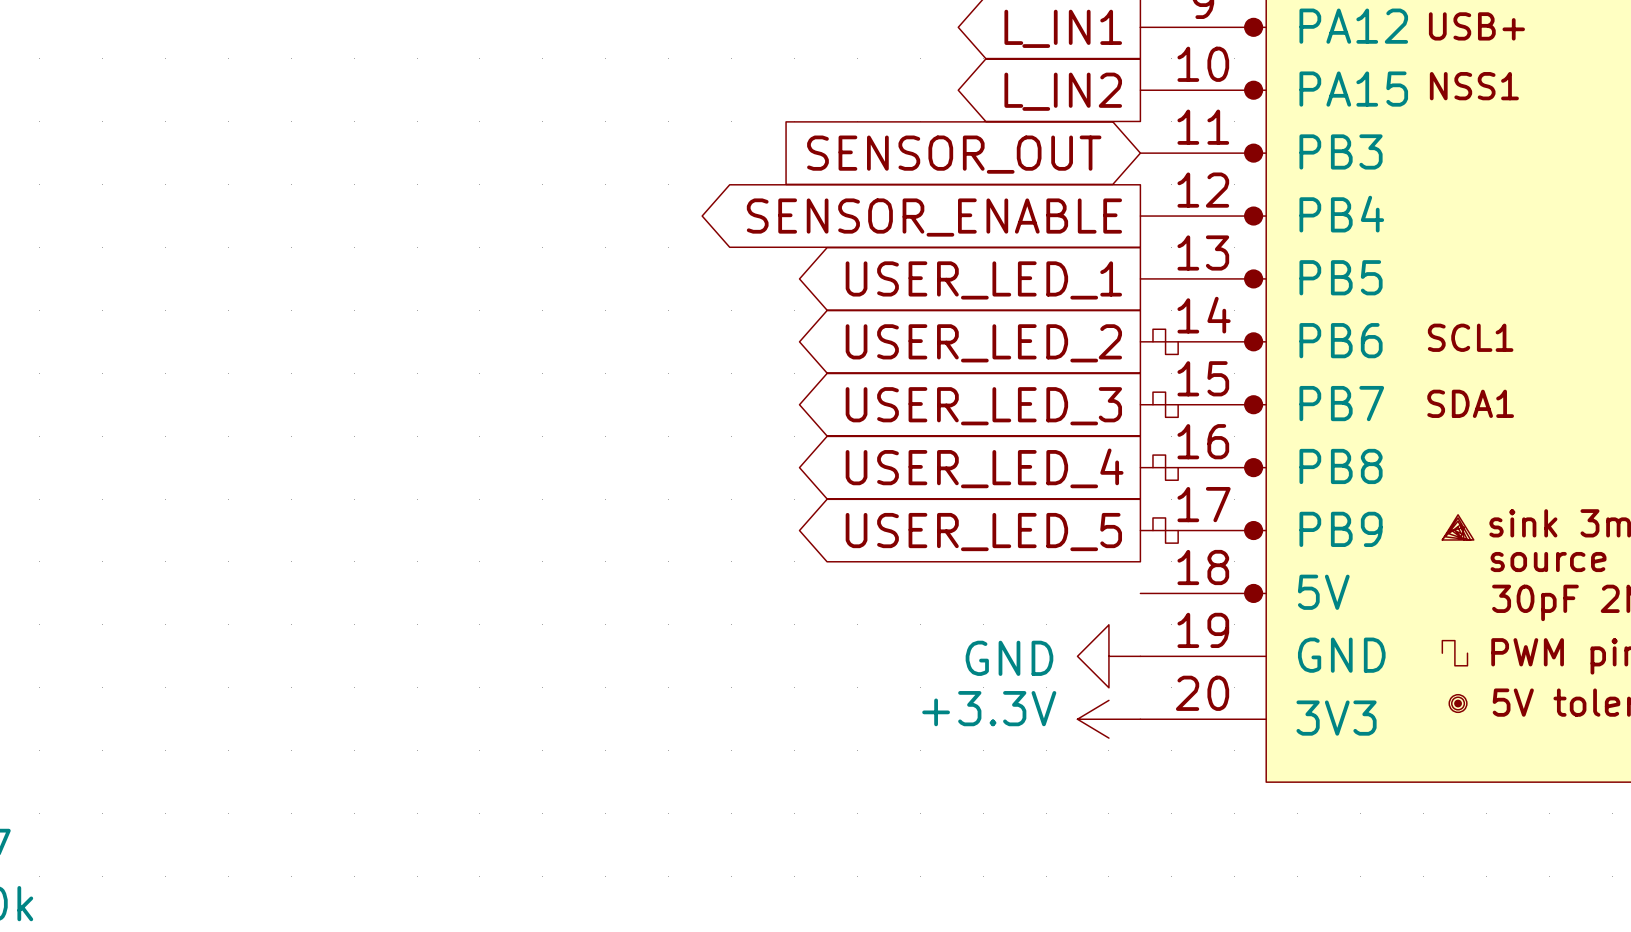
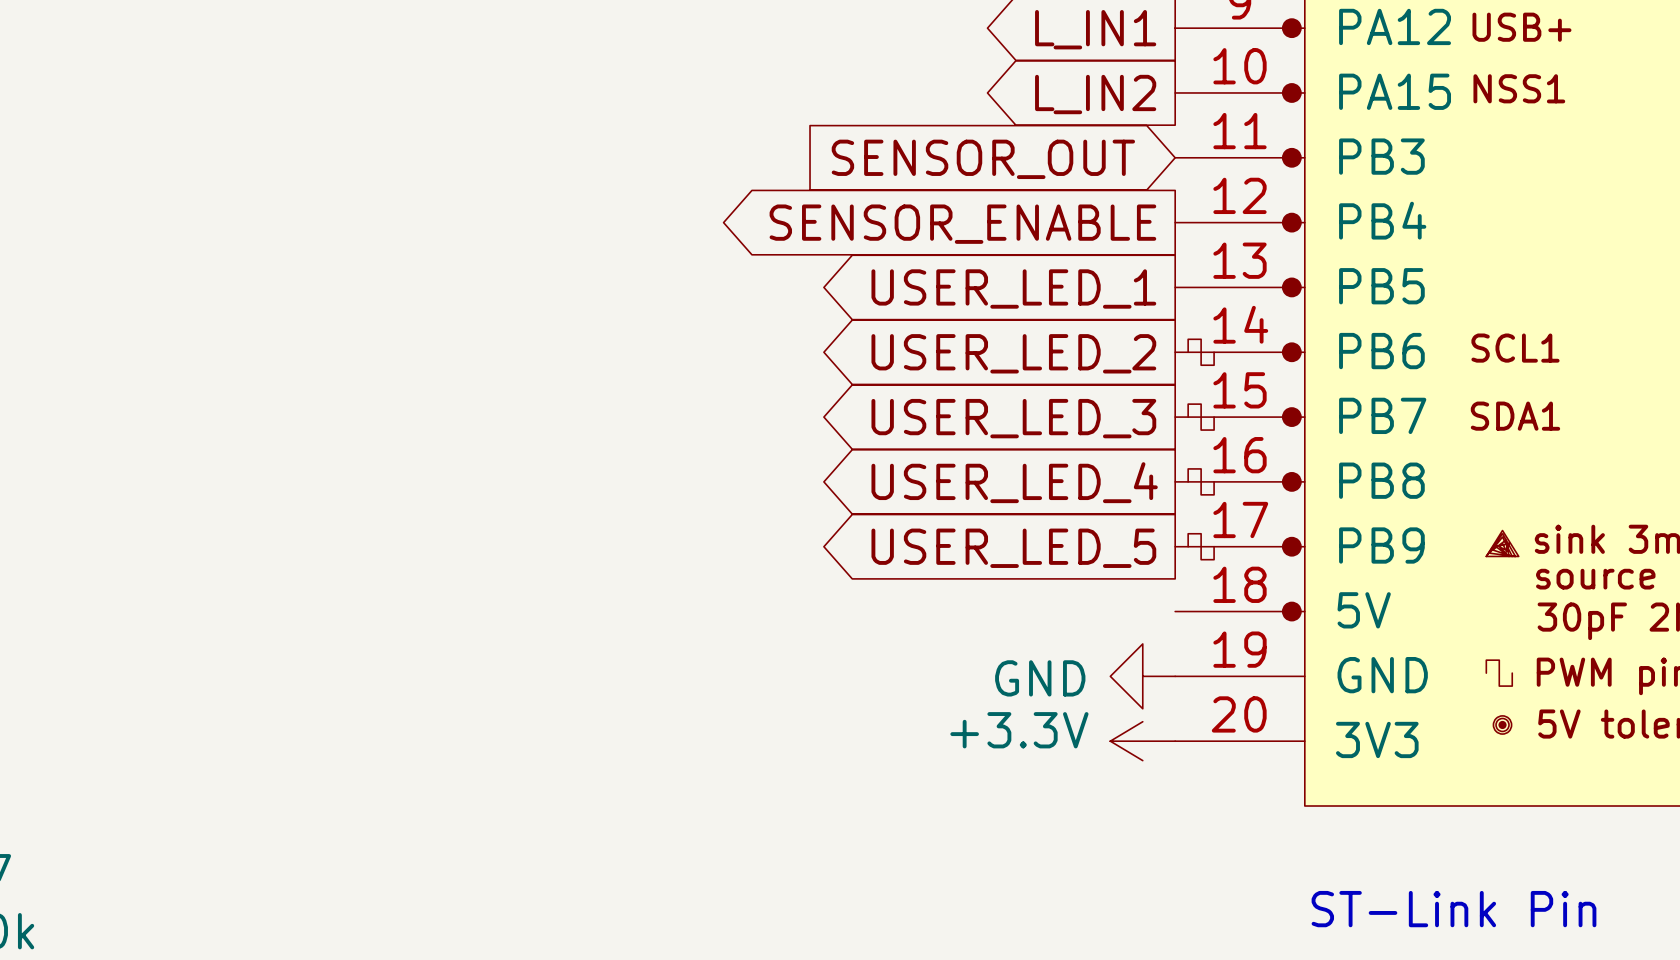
text: none -> ST-Link Pin (1453, 909)

